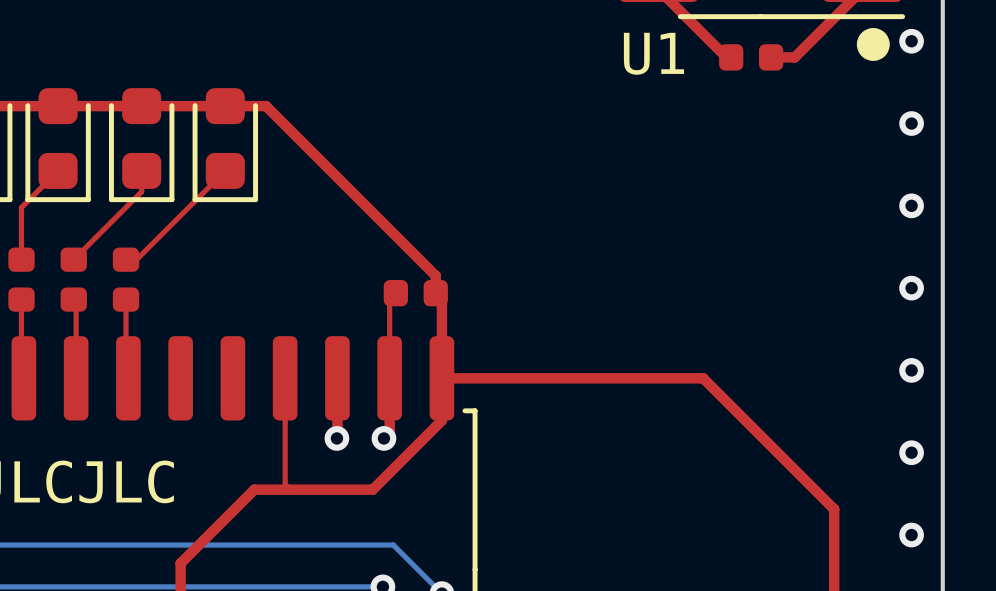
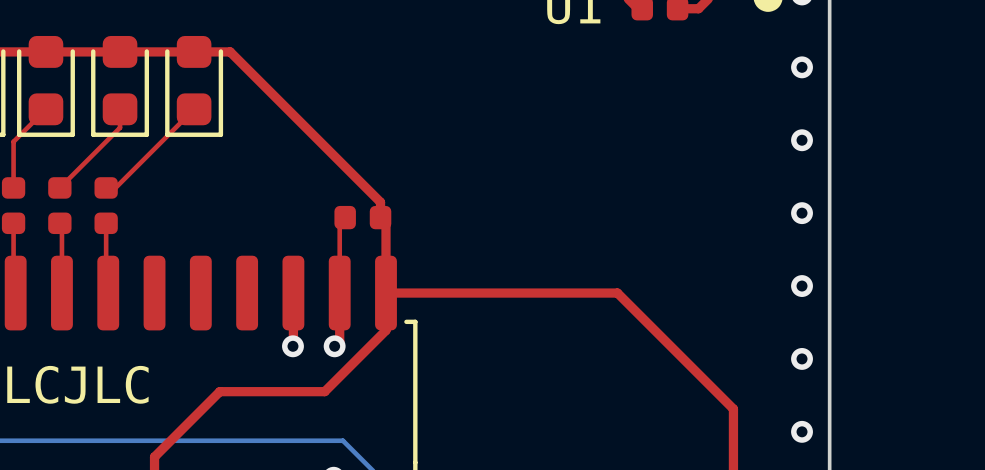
top track: (285, 378) (285, 486) (287, 489) -> none

